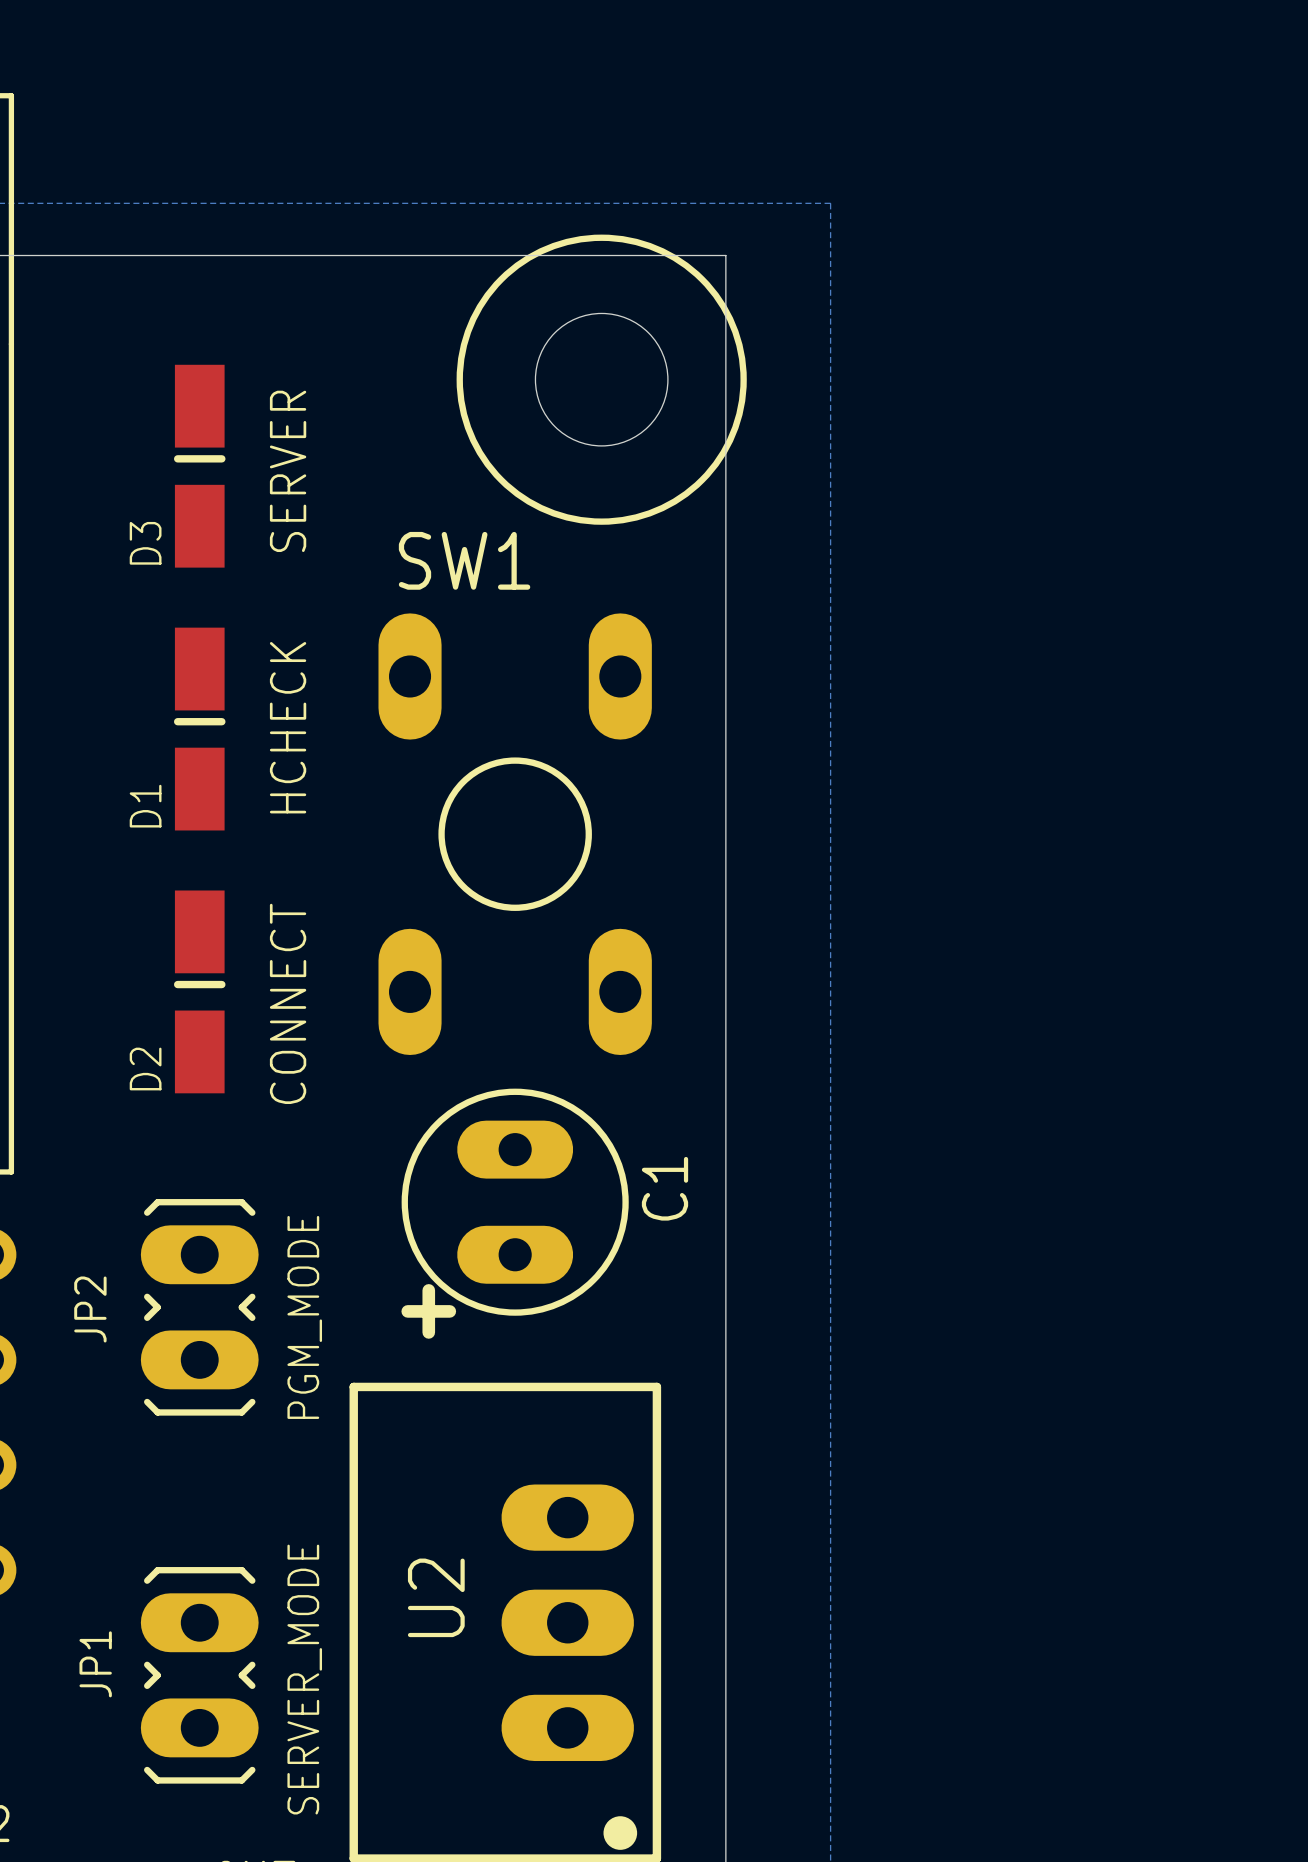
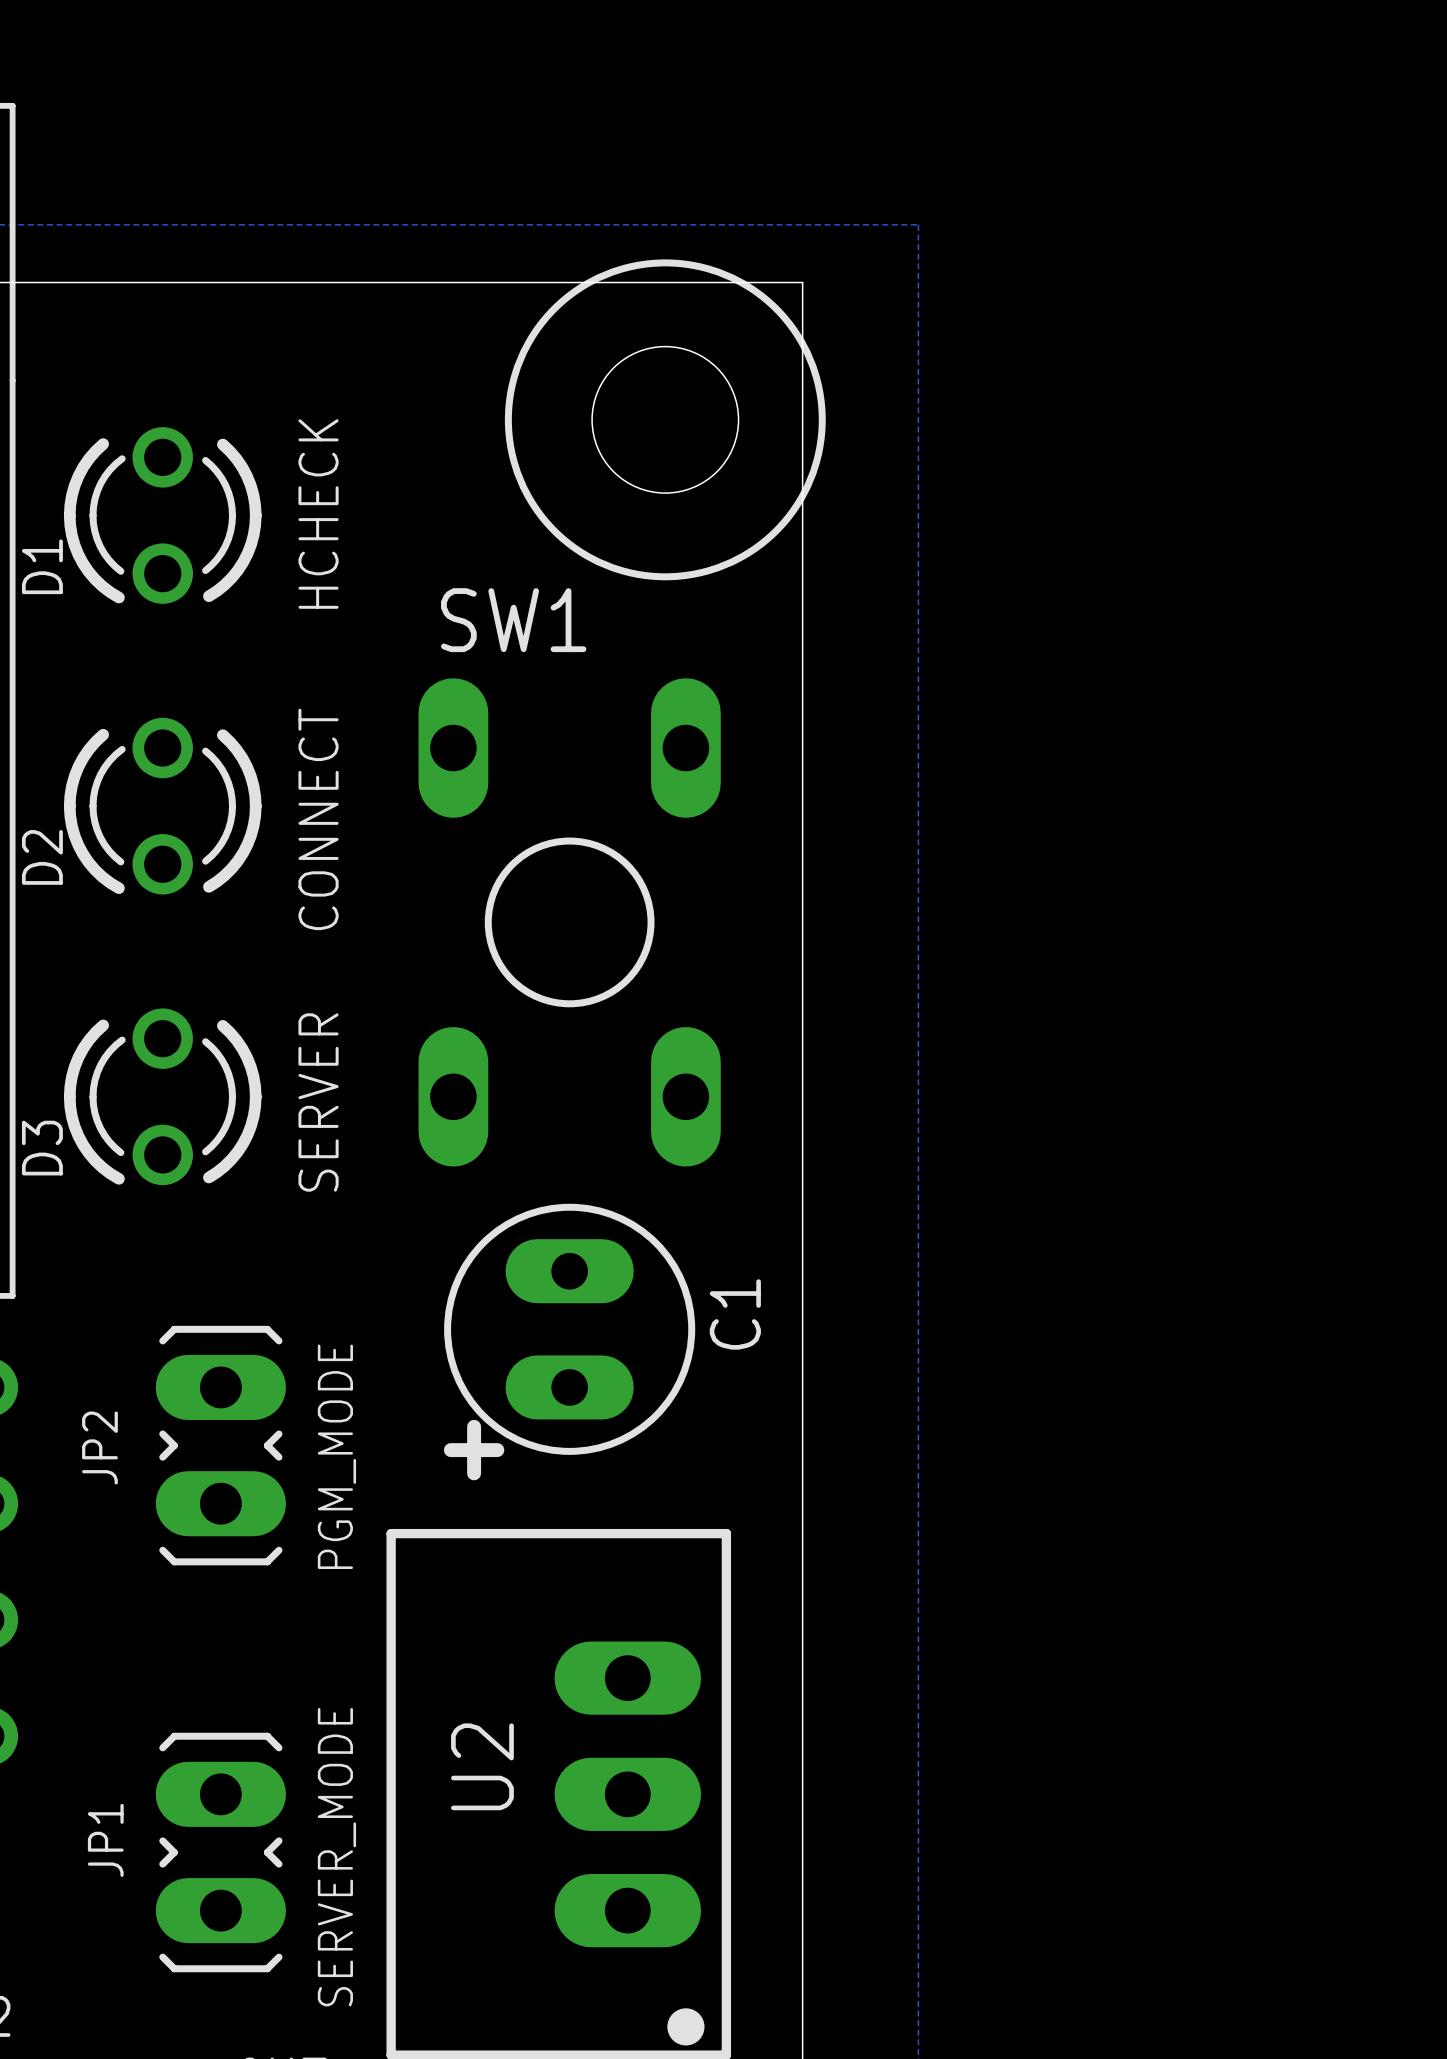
D3 footprint: [173, 364, 226, 568] -> [63, 1008, 262, 1186]
text: SERVER (288, 471) -> HCHECK (318, 514)
D1 footprint: [173, 627, 226, 831] -> [63, 427, 262, 604]
text: HCHECK (288, 727) -> CONNECT (318, 819)
D2 footprint: [173, 890, 226, 1094] -> [63, 717, 262, 895]
text: CONNECT (288, 1003) -> SERVER (318, 1102)

